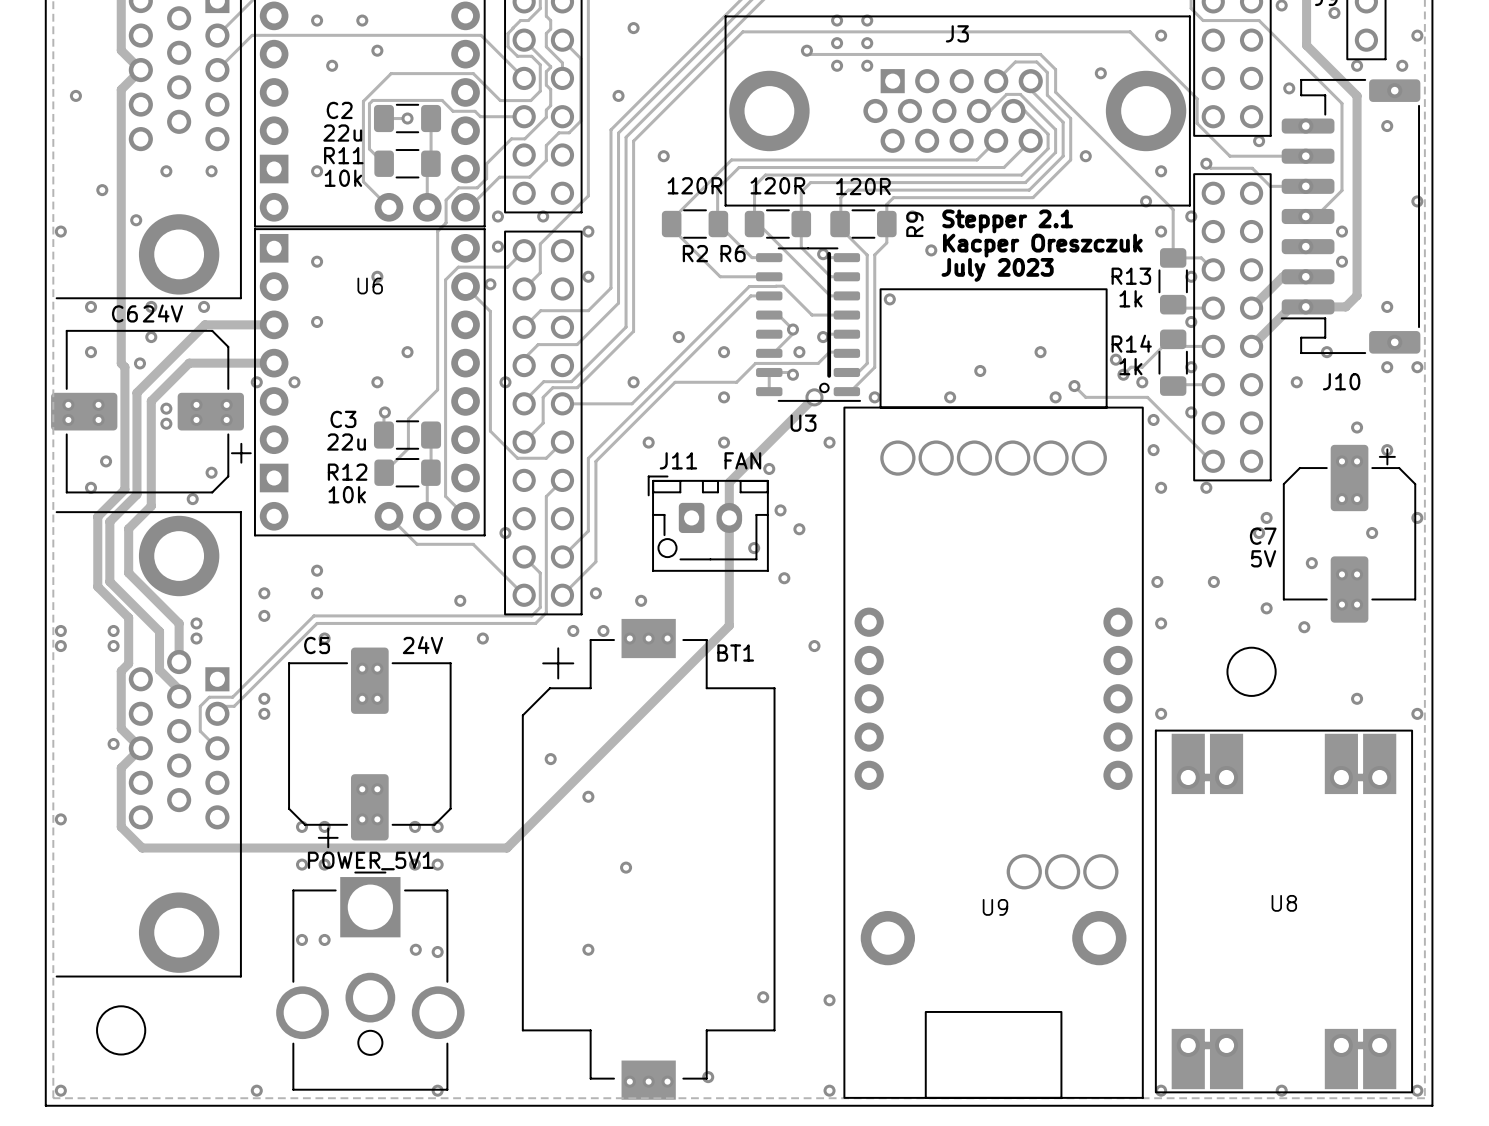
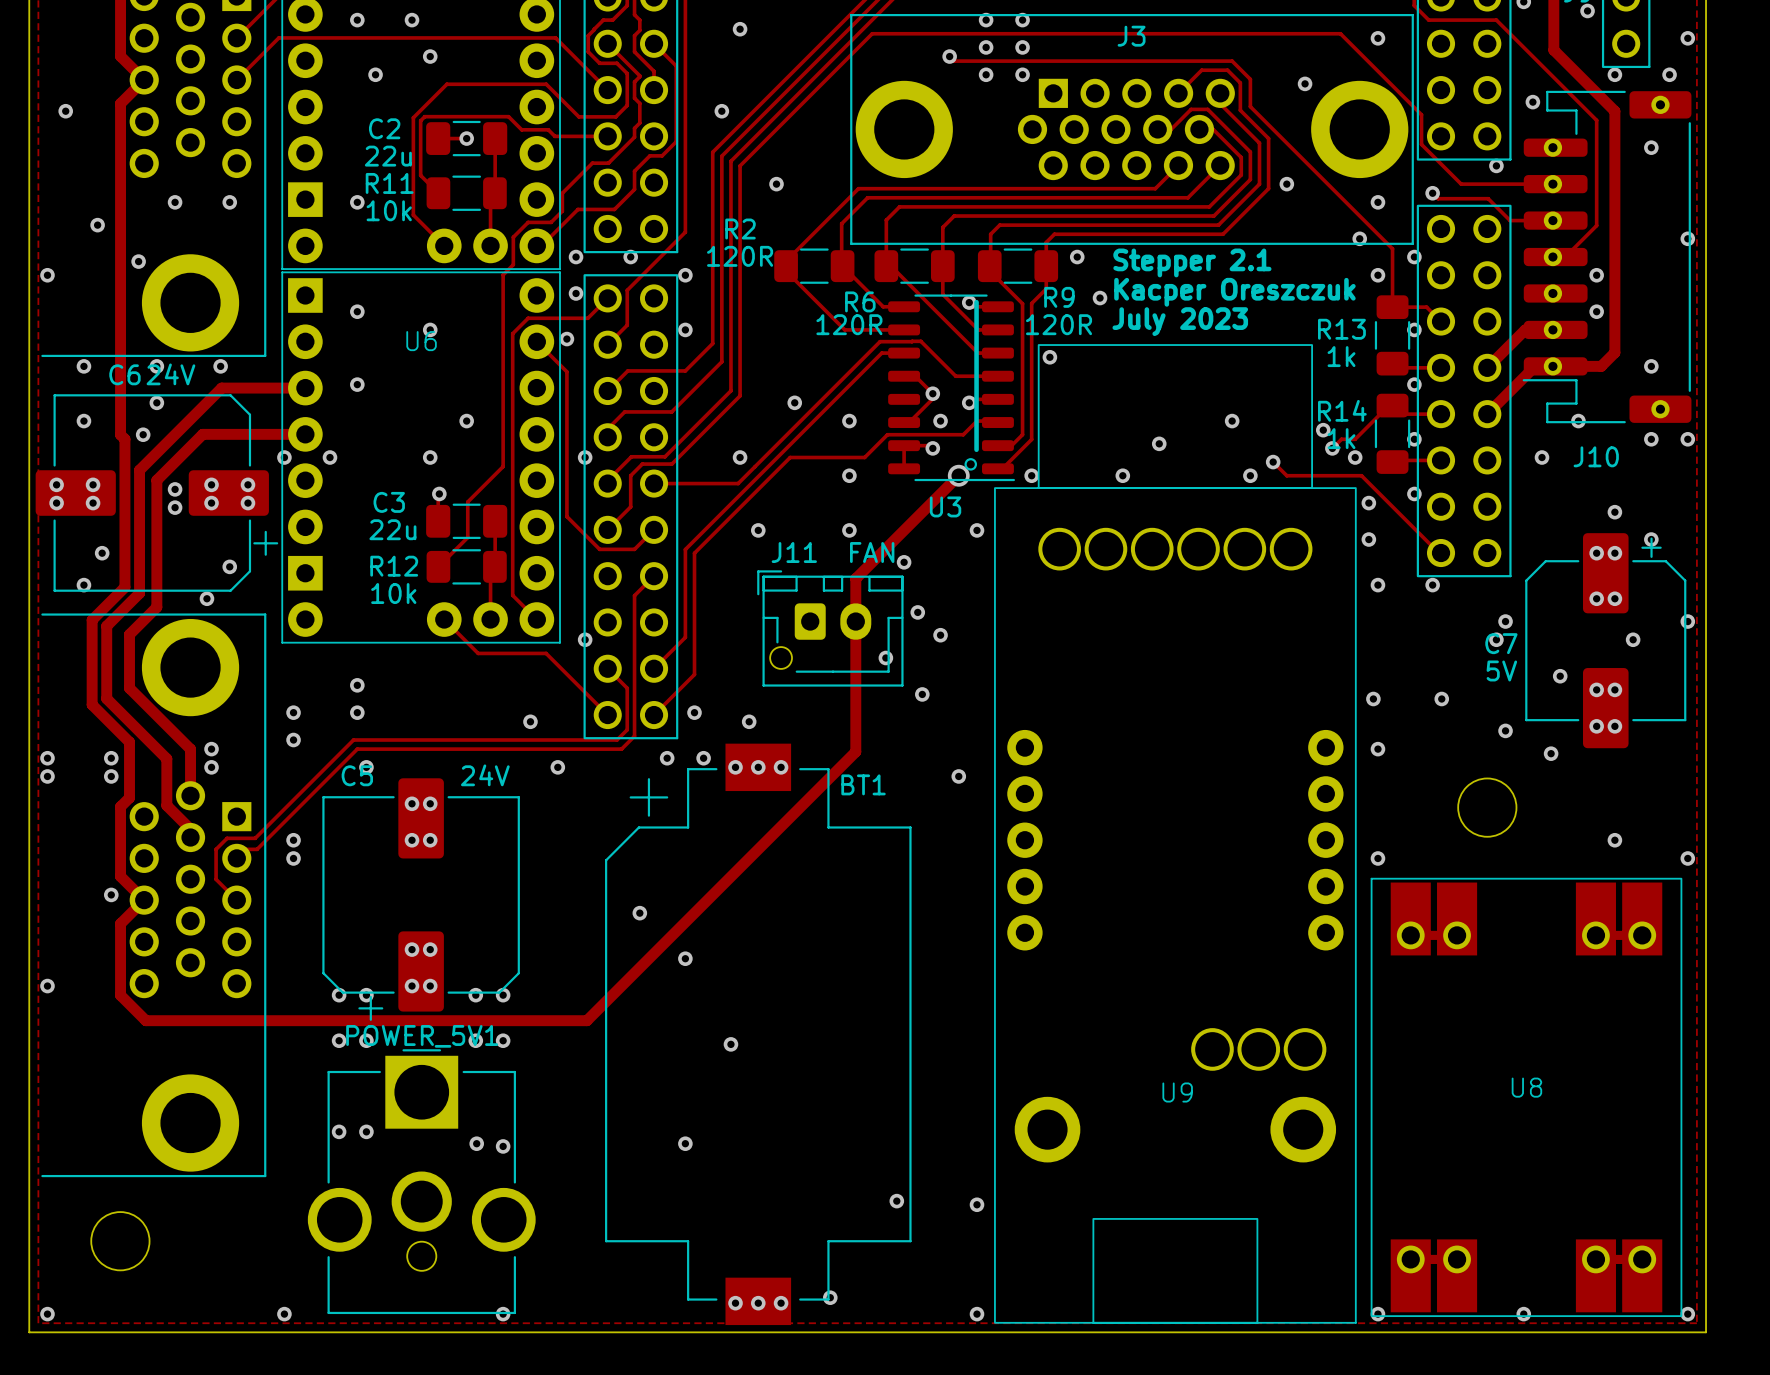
R2 value position: 120R (695, 185) -> 120R (740, 256)
R6 value position: 120R (777, 185) -> 120R (849, 324)
R9 value position: 120R (863, 186) -> 120R (1059, 324)
R9 name rotation: 0° (914, 224) -> 90° clockwise (1059, 297)
R2 name position: R2 (695, 253) -> R2 (740, 229)

